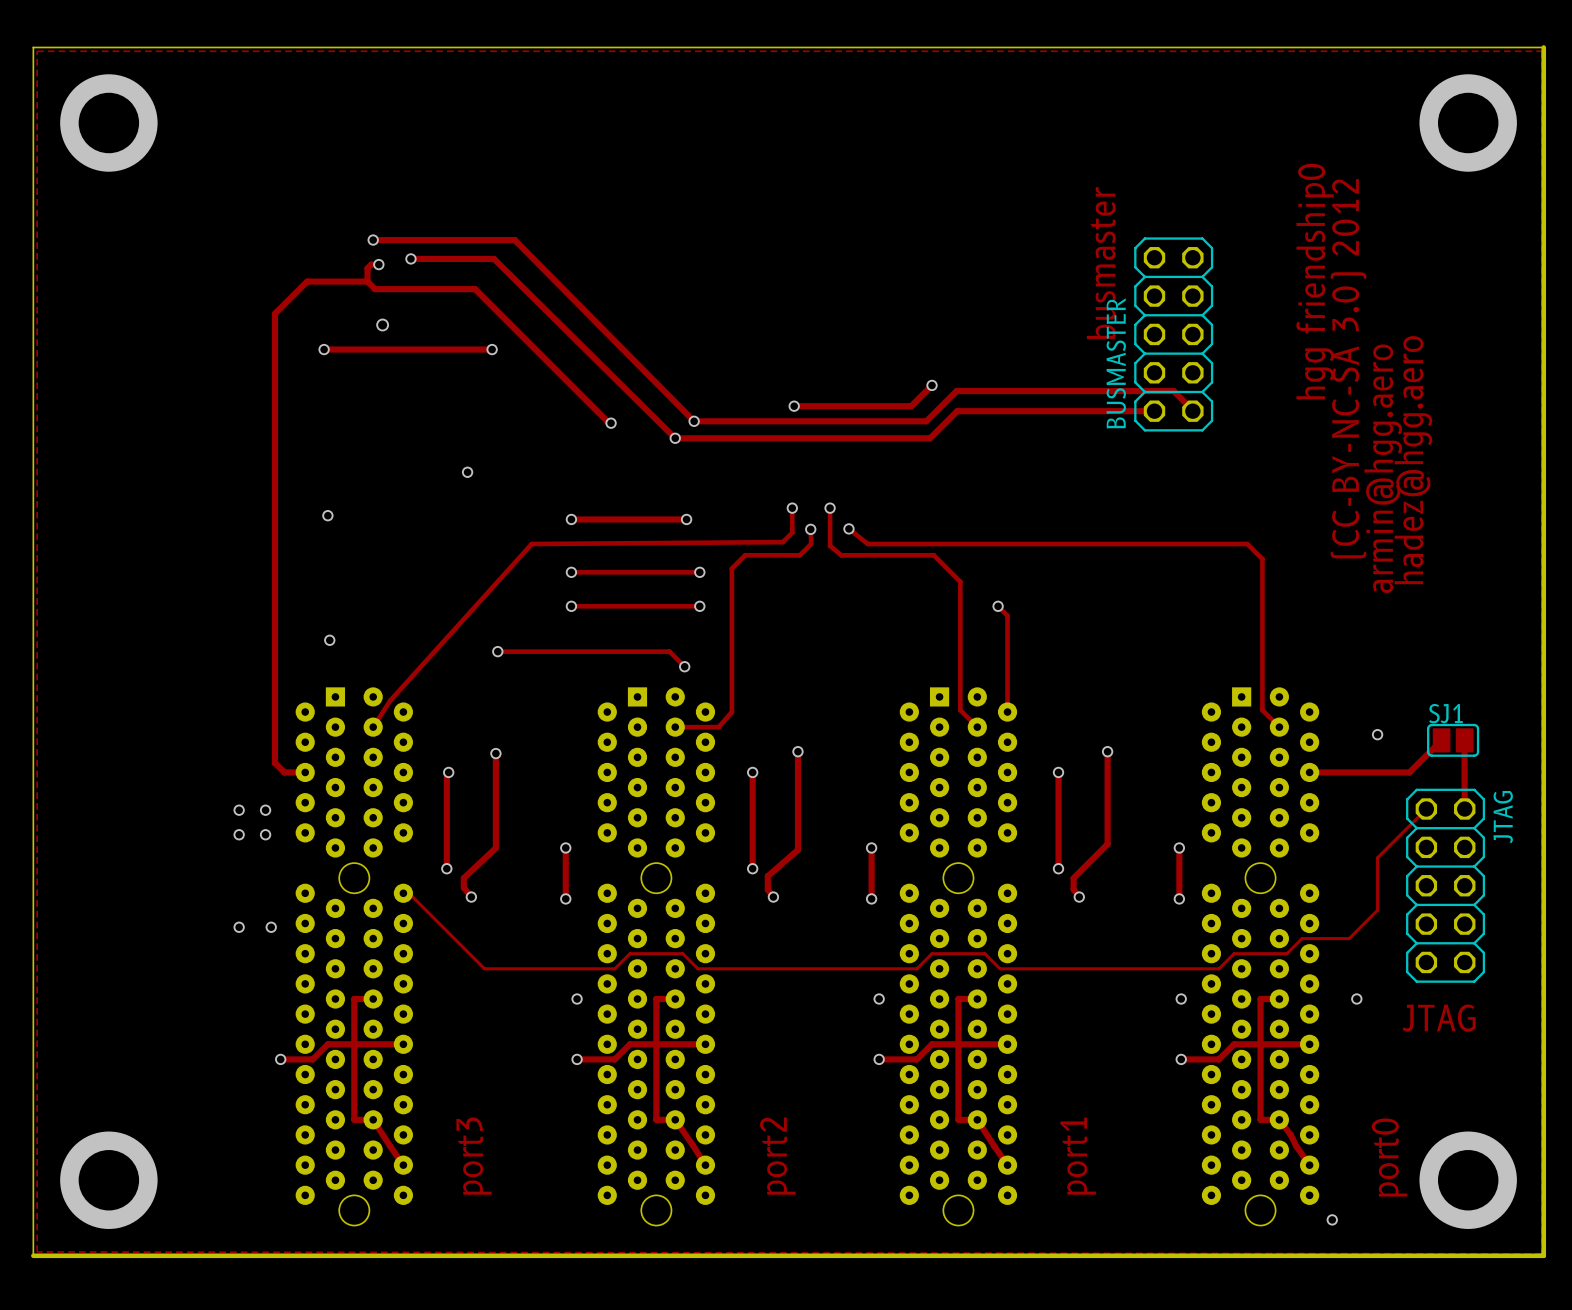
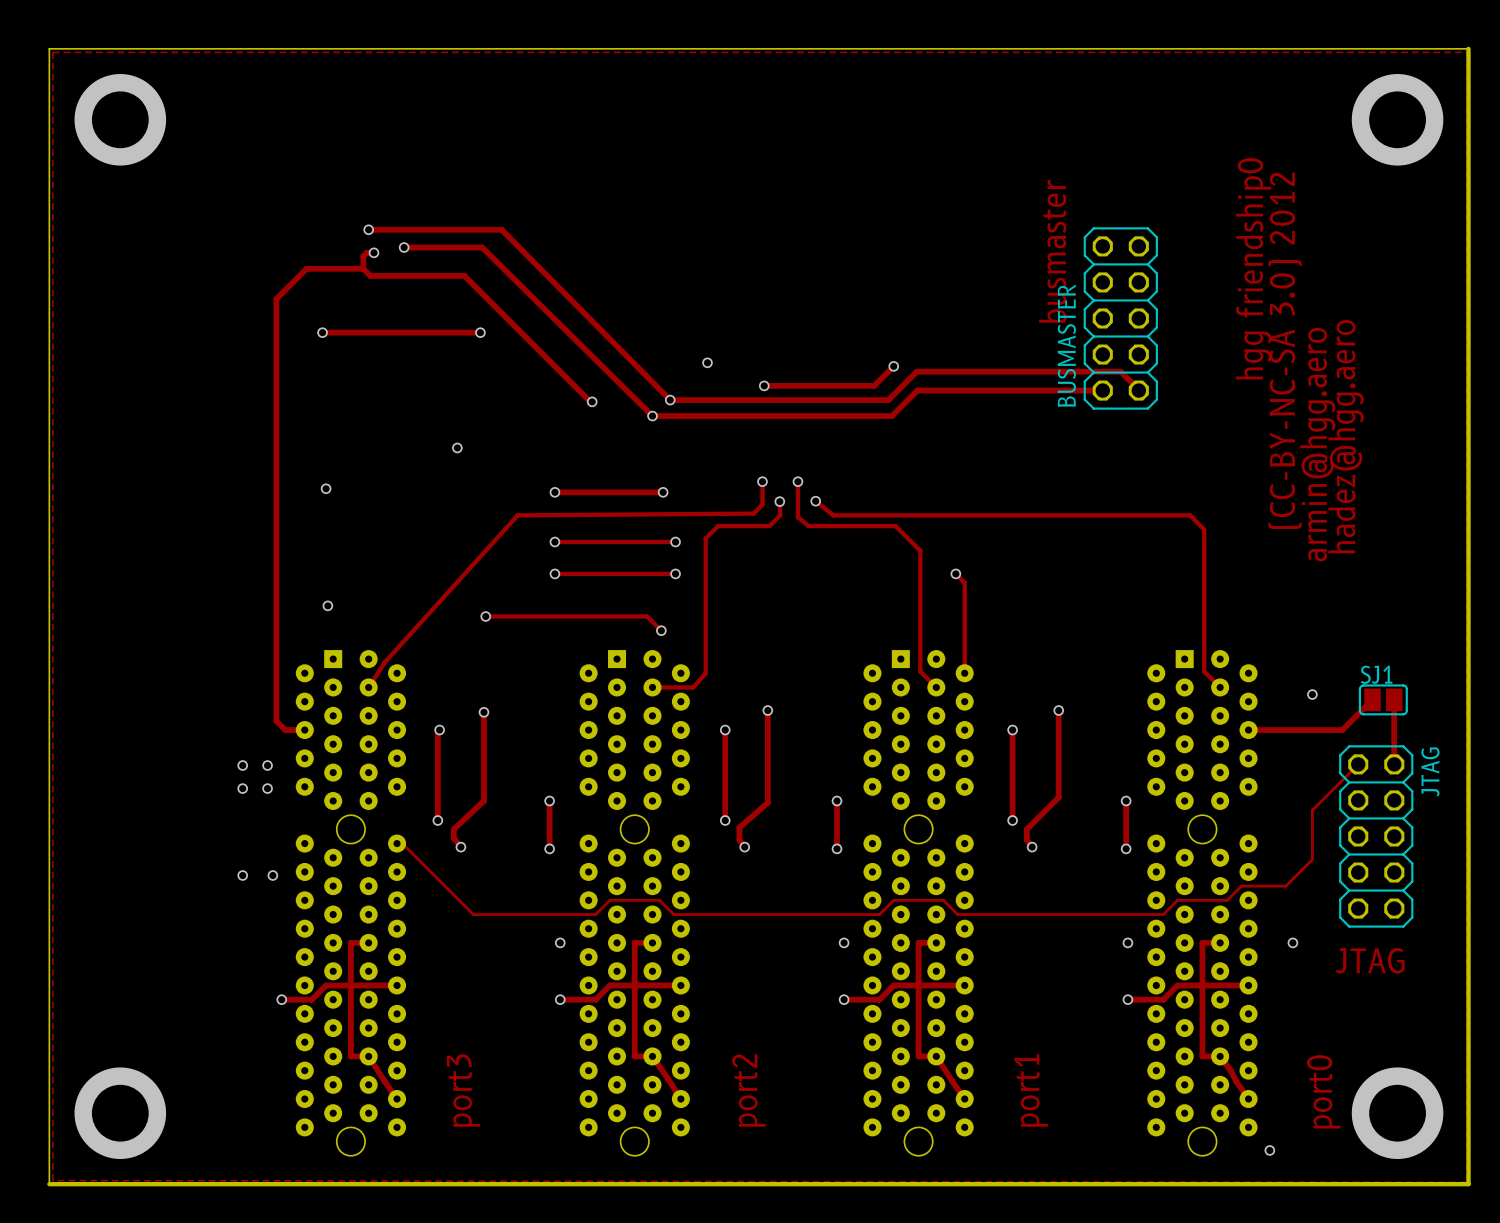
via: (382, 325) -> none
via: none -> (707, 362)

